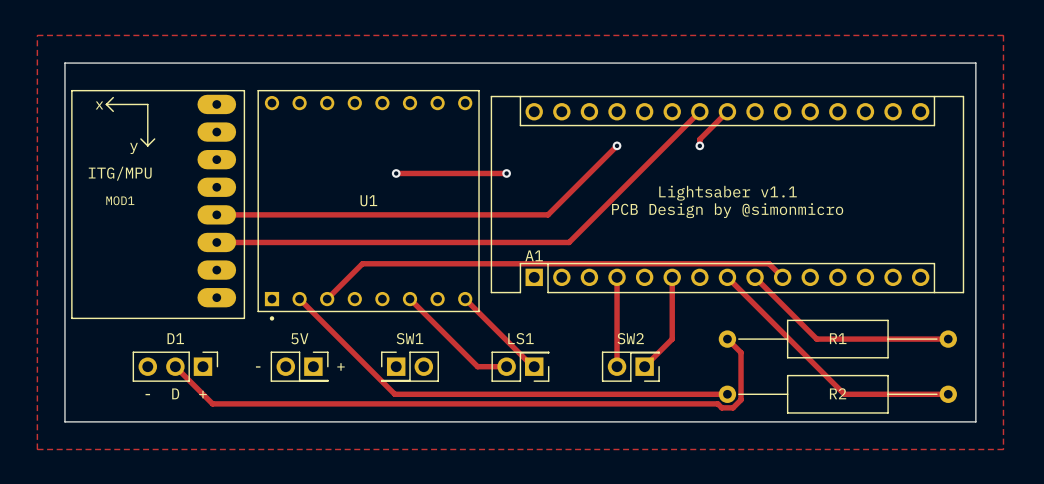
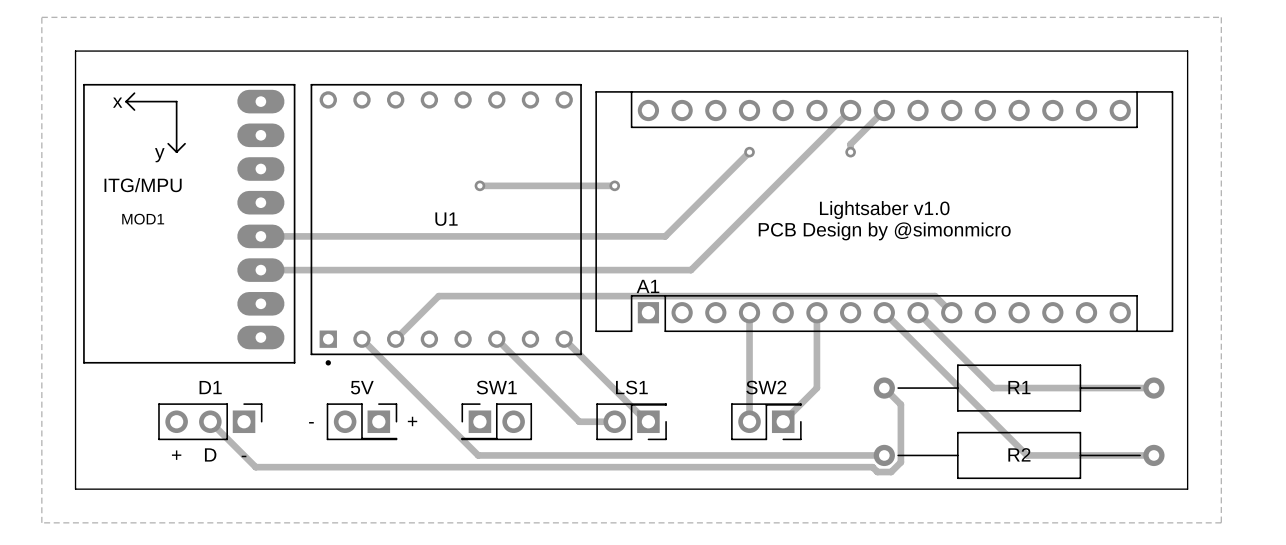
text: Lightsaber v1.1 (728, 193) -> Lightsaber v1.0 (884, 210)
text: - (147, 394) -> + (176, 455)
text: + (202, 394) -> - (244, 456)

